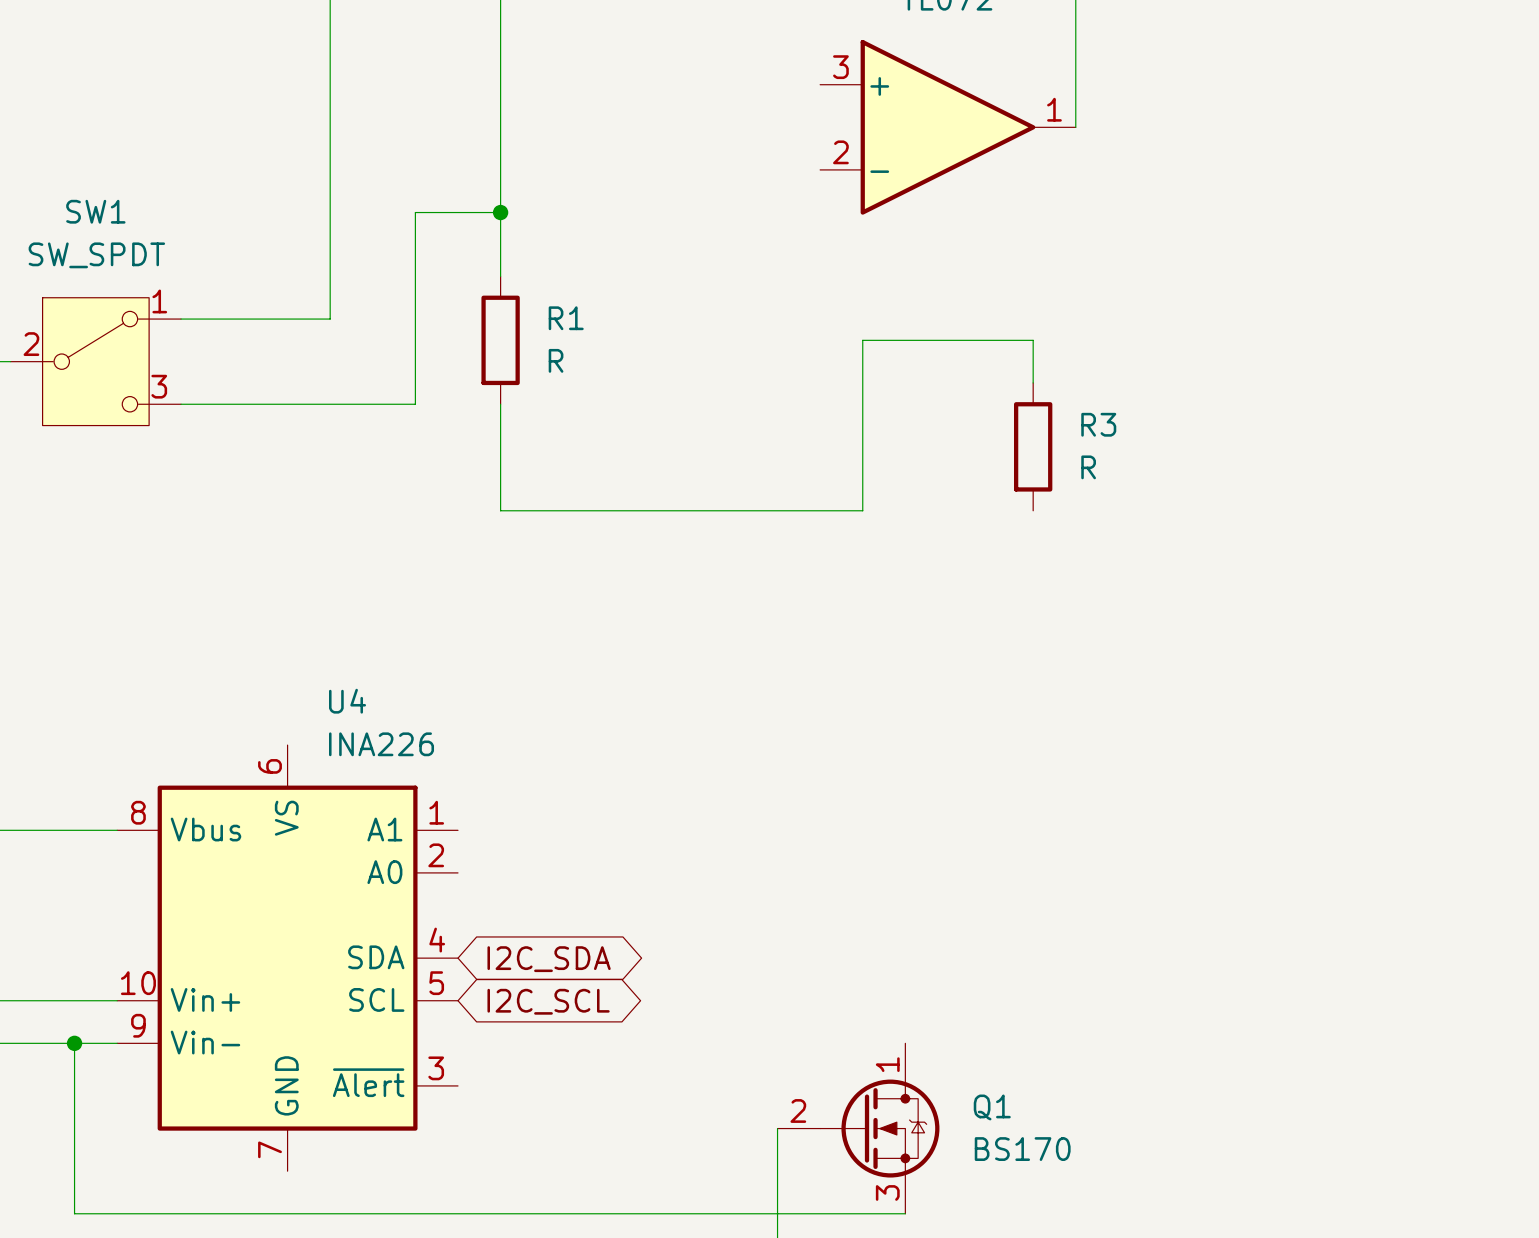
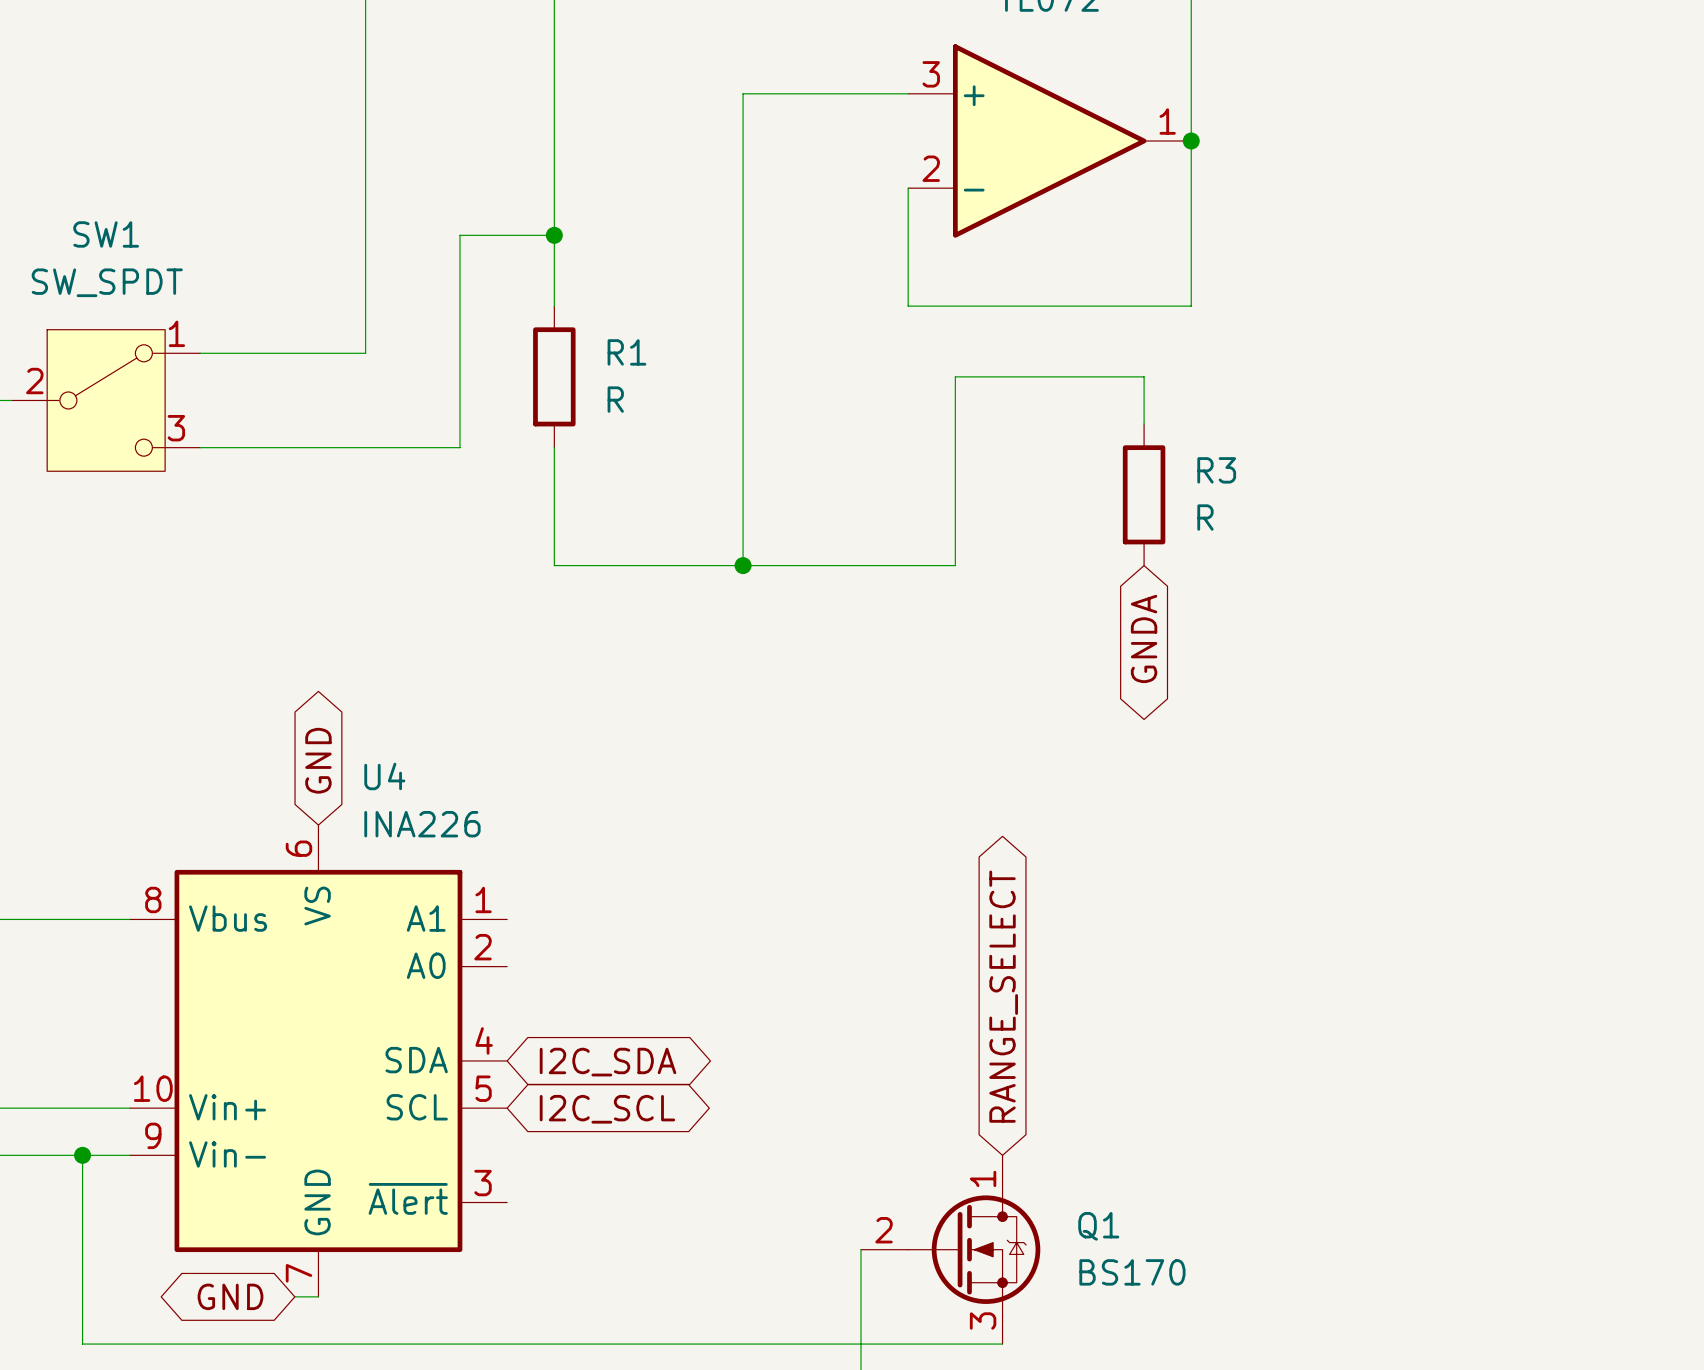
wire: none -> (908, 93) (743, 93) (743, 565)
wire: none -> (1191, 140) (1191, 306) (908, 306) (908, 188)
junction: none -> (1191, 140)
junction: none -> (743, 565)
global label: none -> GNDA (1144, 638)
global label: none -> GND (318, 760)
global label: none -> RANGE_SELECT (1003, 996)
global label: none -> GND (230, 1296)
wire: none -> (294, 1296) (318, 1296)

